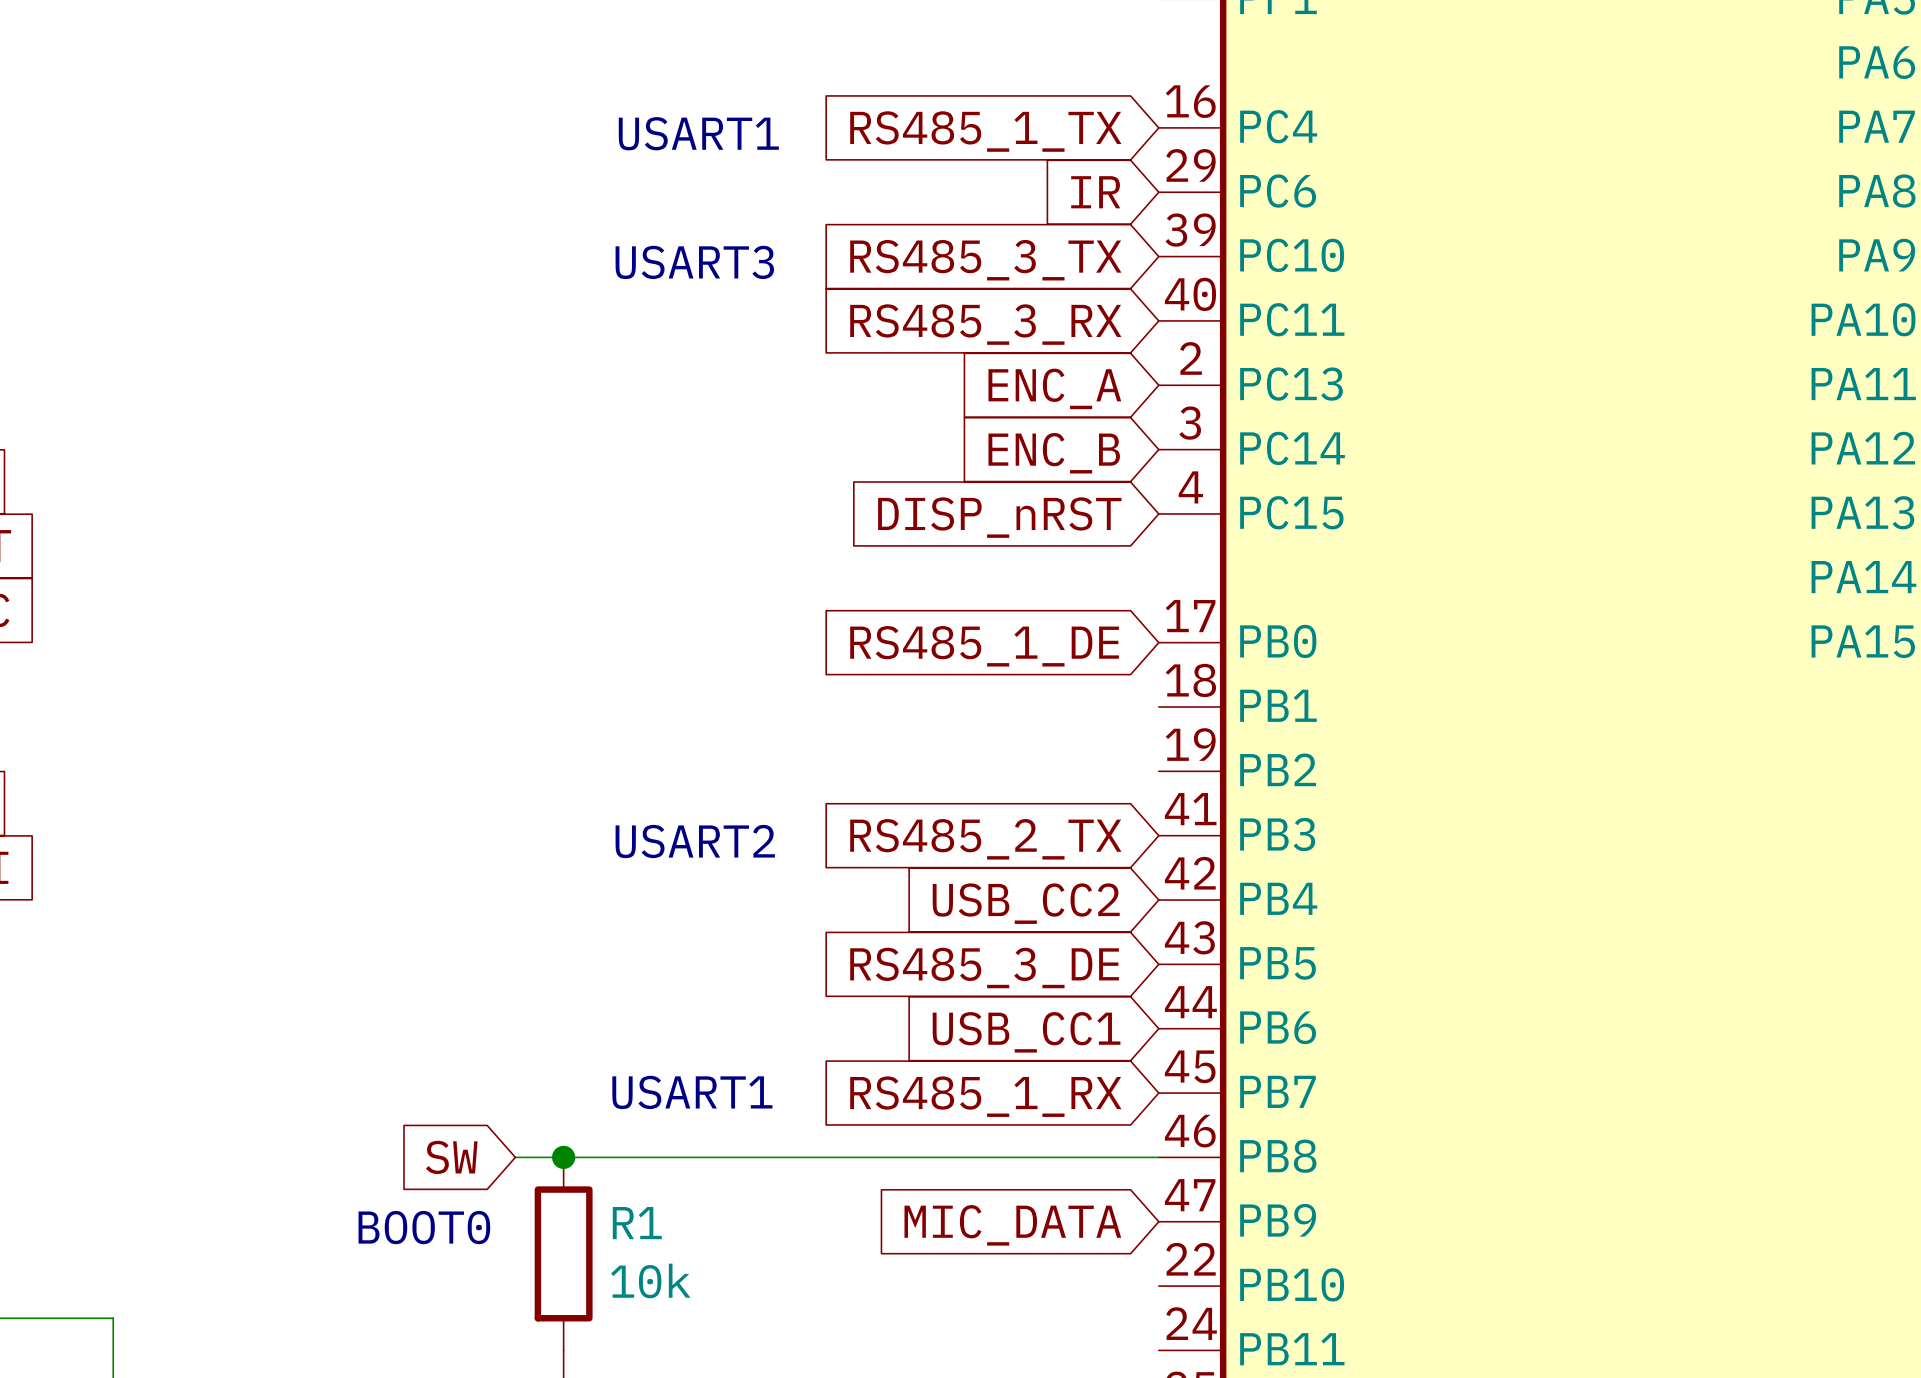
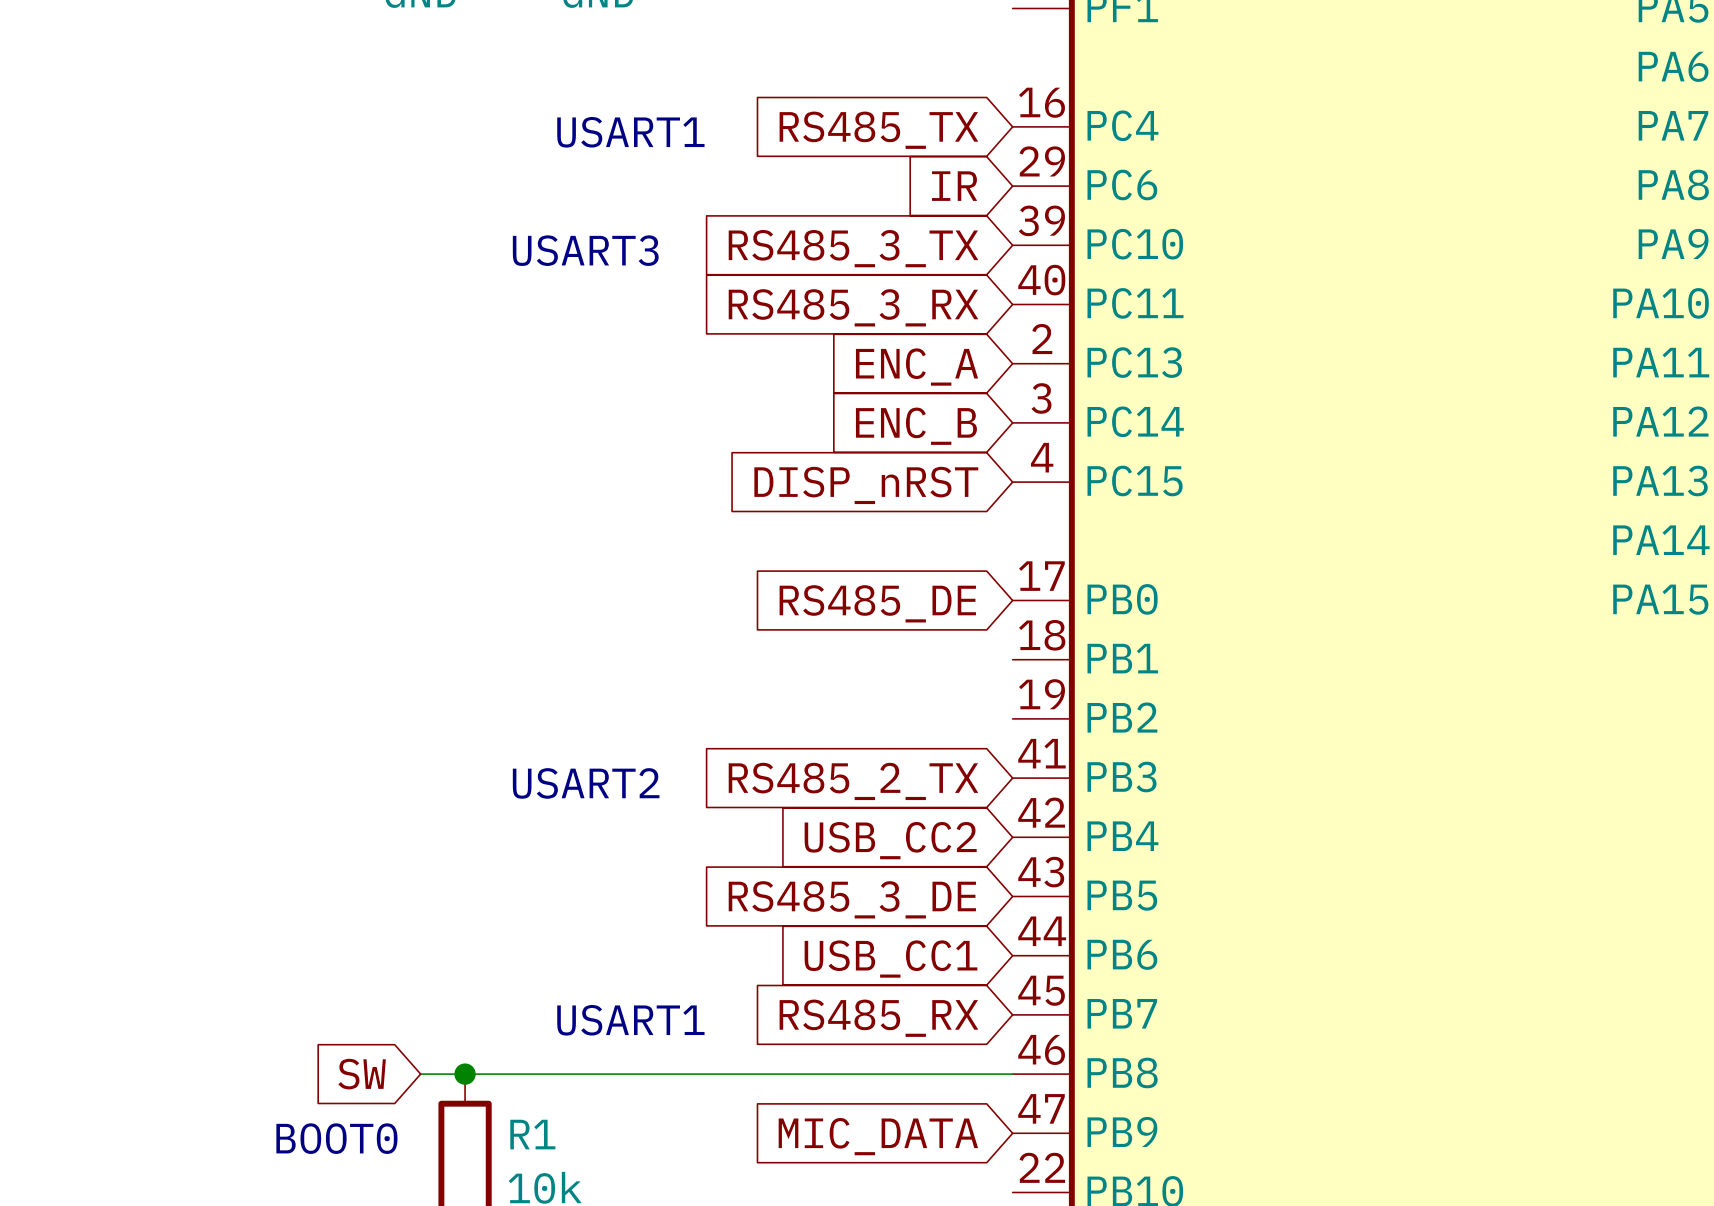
global label: RS485_1_TX (985, 131) -> RS485_TX (878, 130)
text position: USART1 (698, 133) -> USART1 (630, 132)
global label: RS485_1_DE (984, 646) -> RS485_DE (877, 603)
text position: USART1 (692, 1092) -> USART1 (630, 1020)
global label: RS485_1_RX (985, 1096) -> RS485_RX (878, 1018)

